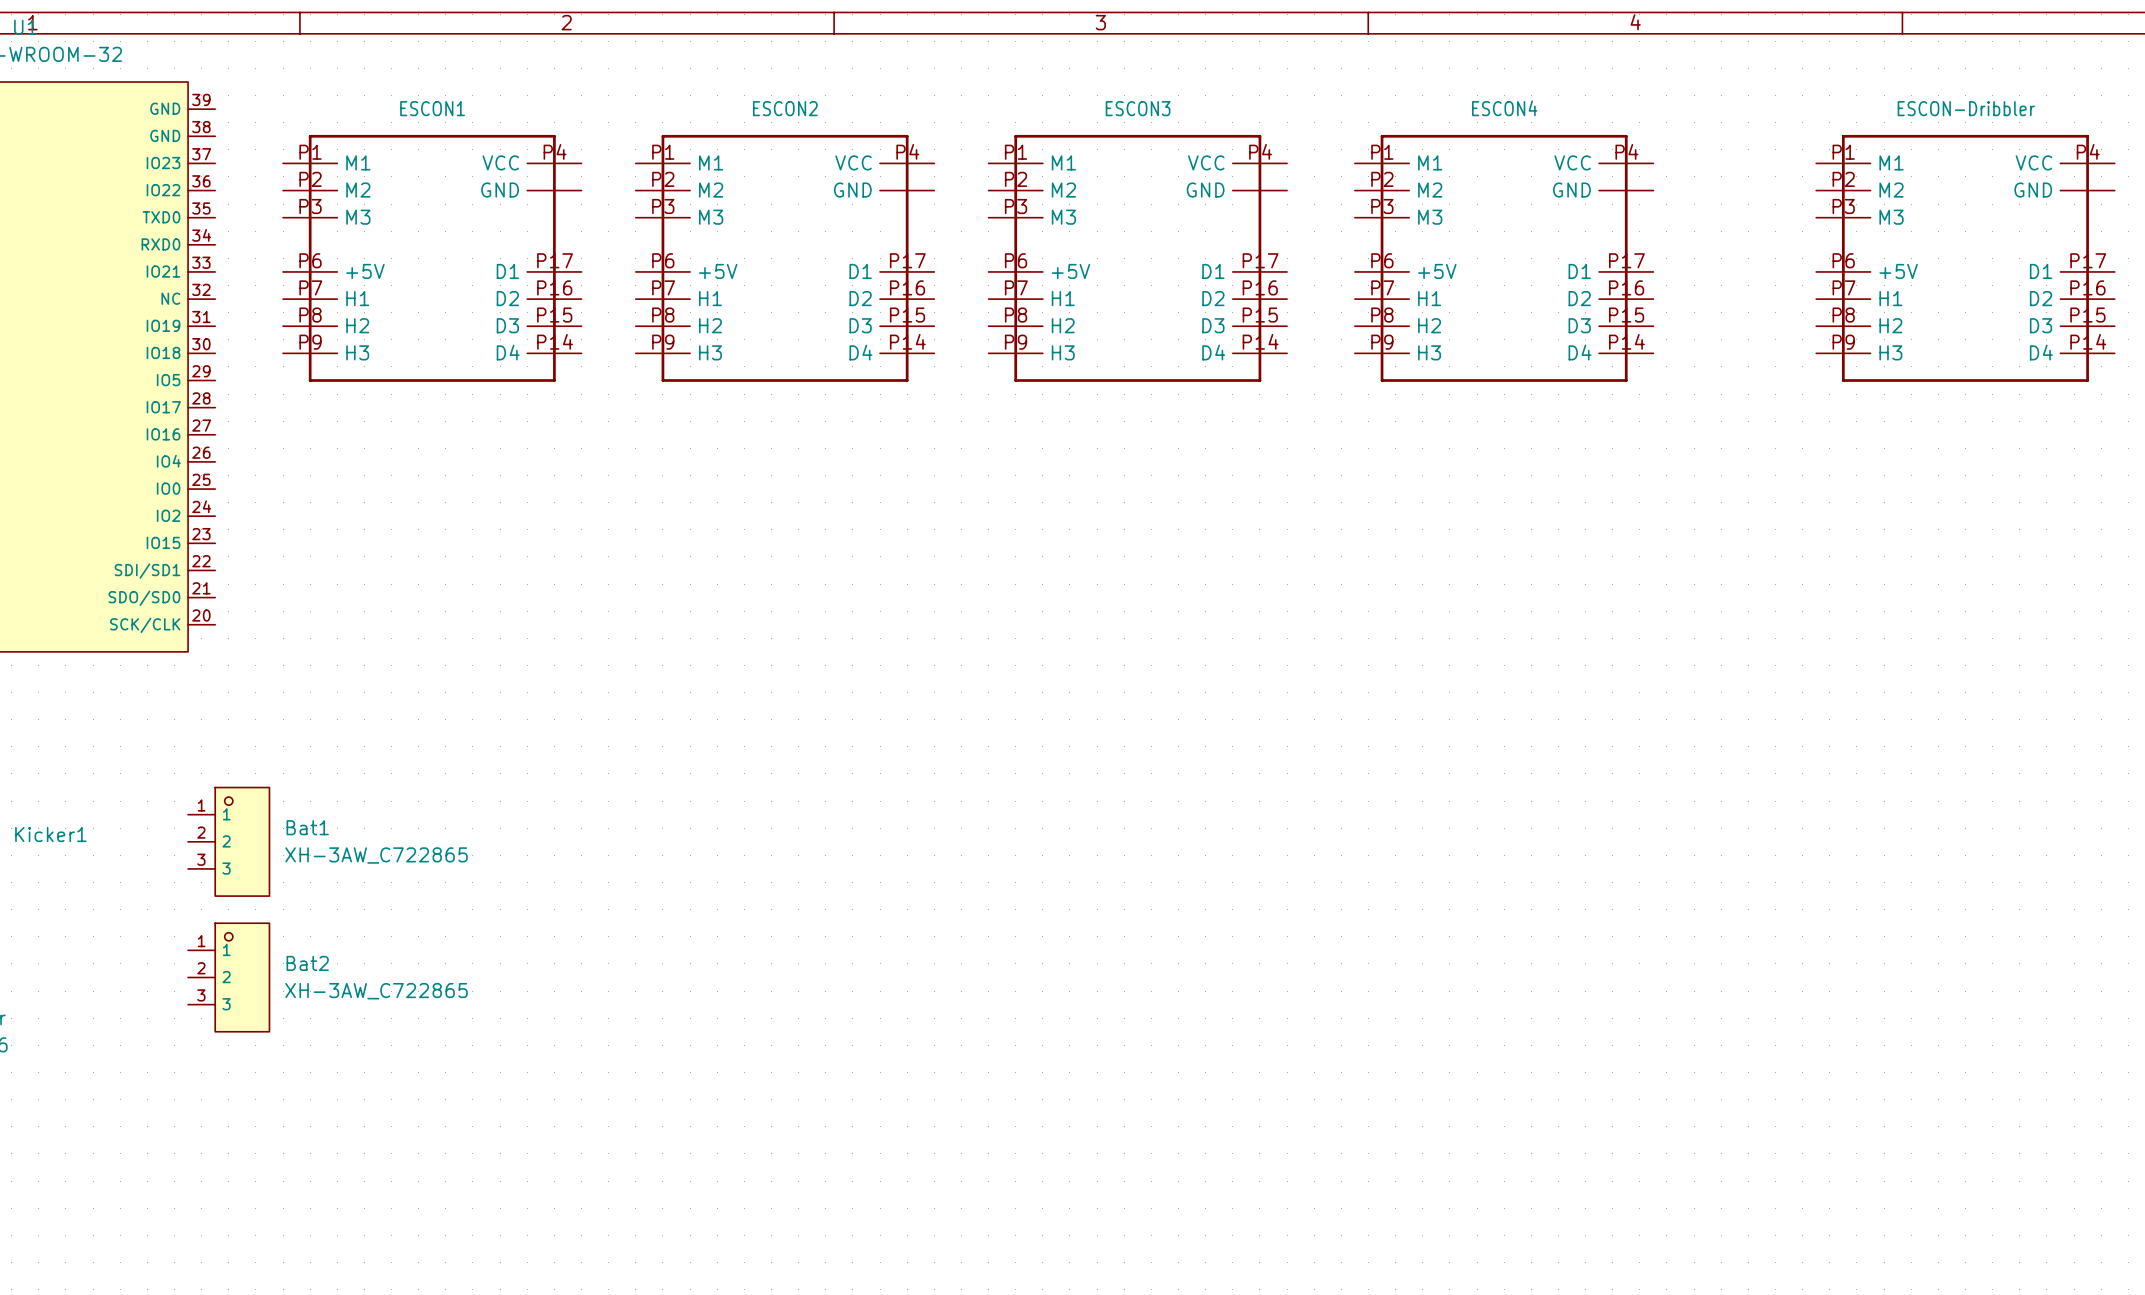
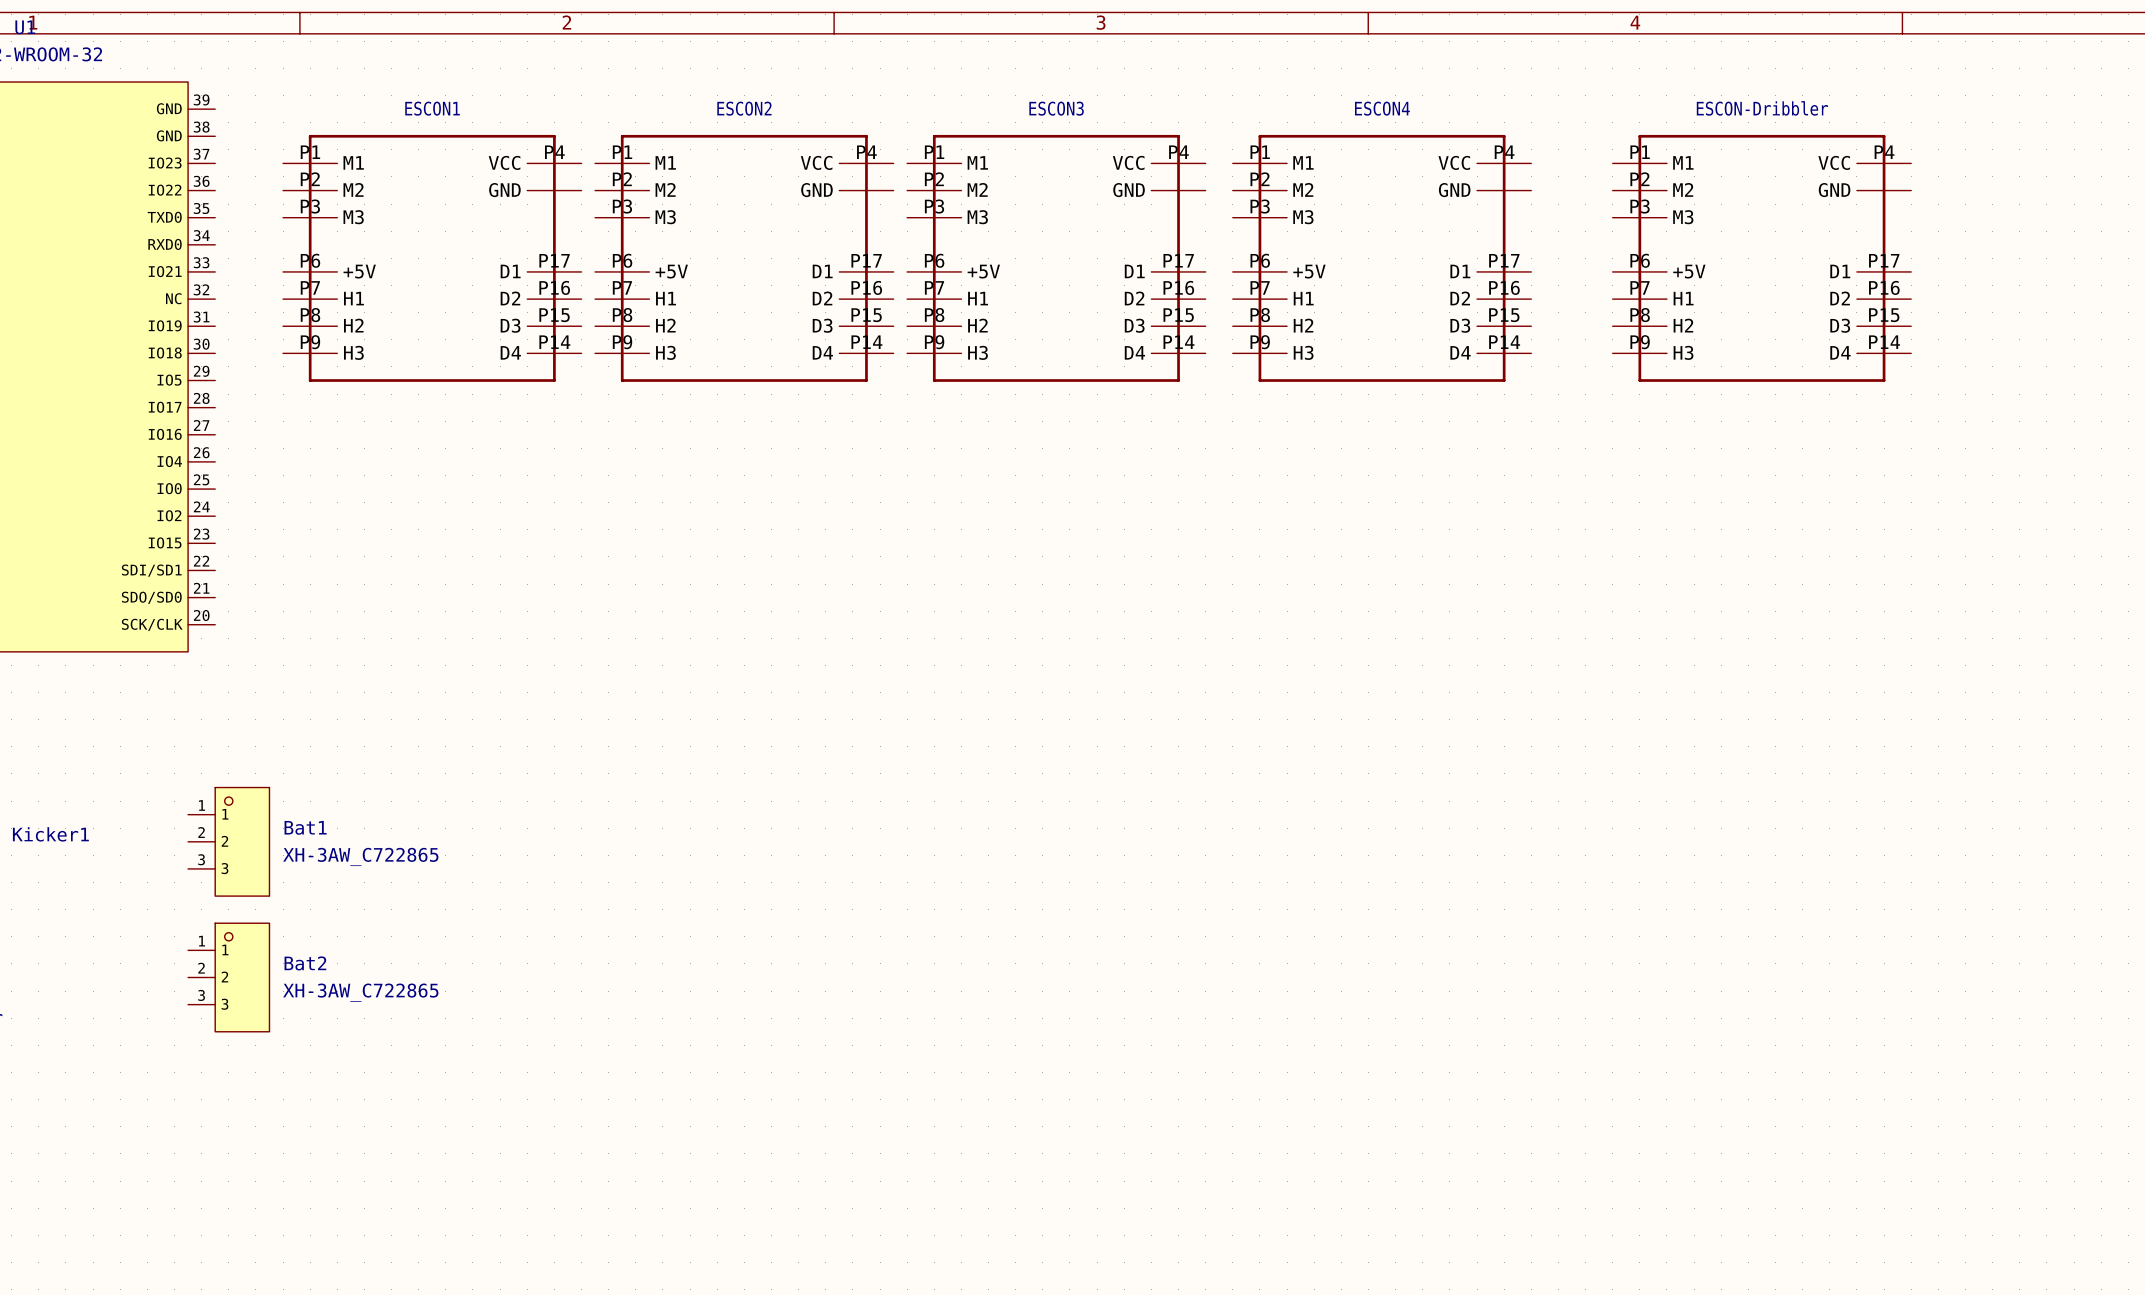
ESCON2 position: (785, 258) -> (744, 258)
ESCON3 position: (1137, 258) -> (1056, 258)
ESCON4 position: (1504, 258) -> (1382, 258)
ESCON-Dribbler position: (1965, 258) -> (1761, 258)

